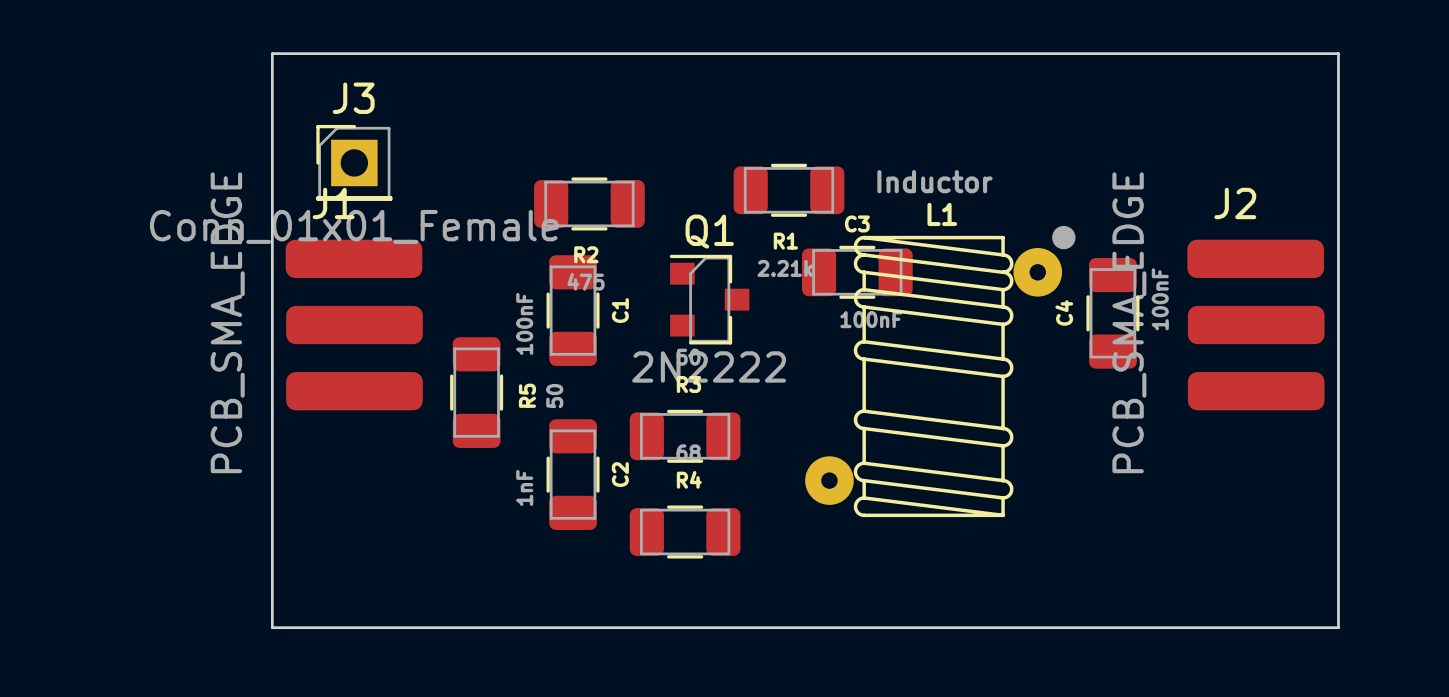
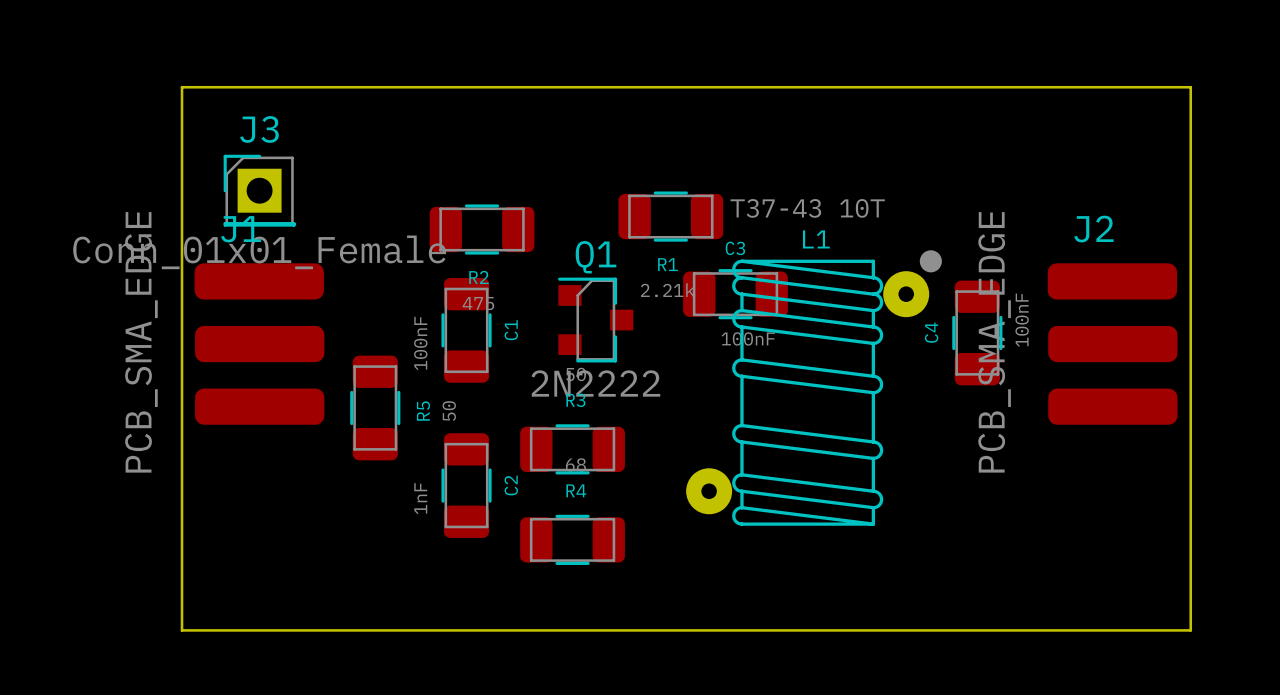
L1 value: Inductor (934, 181) -> T37-43 10T (807, 208)

